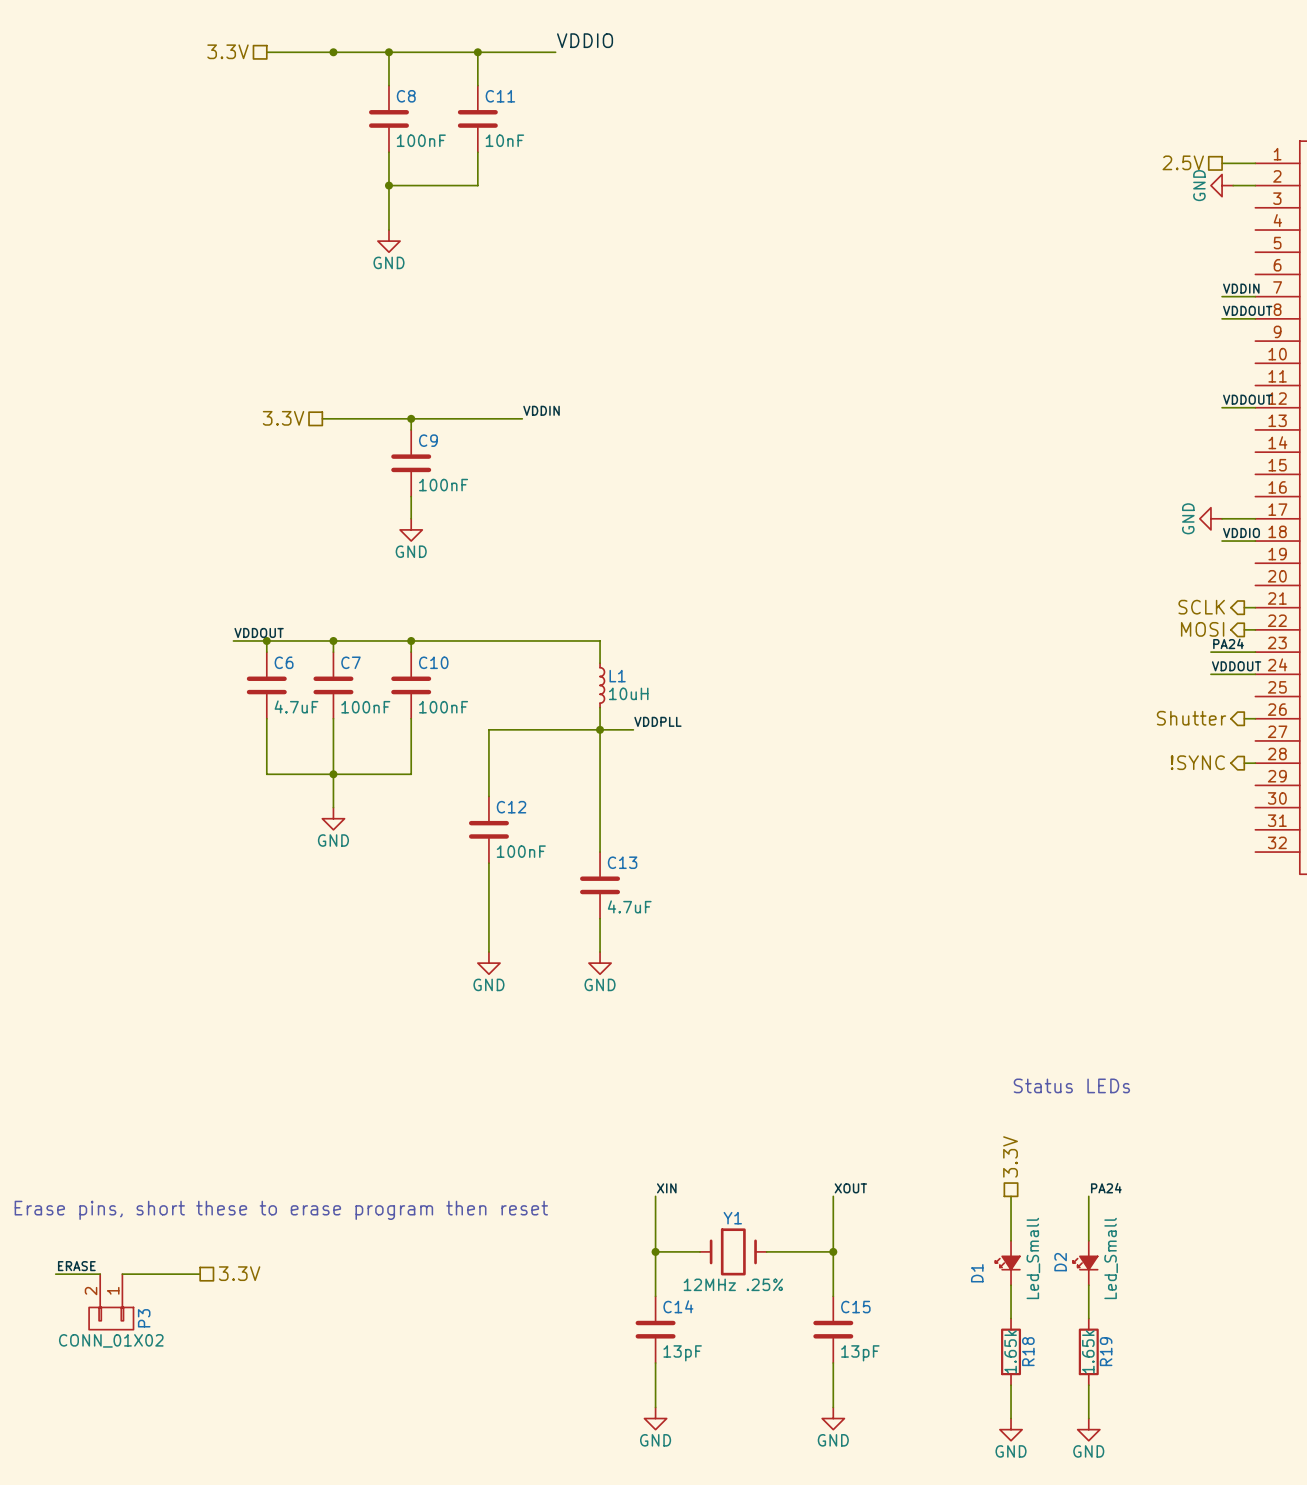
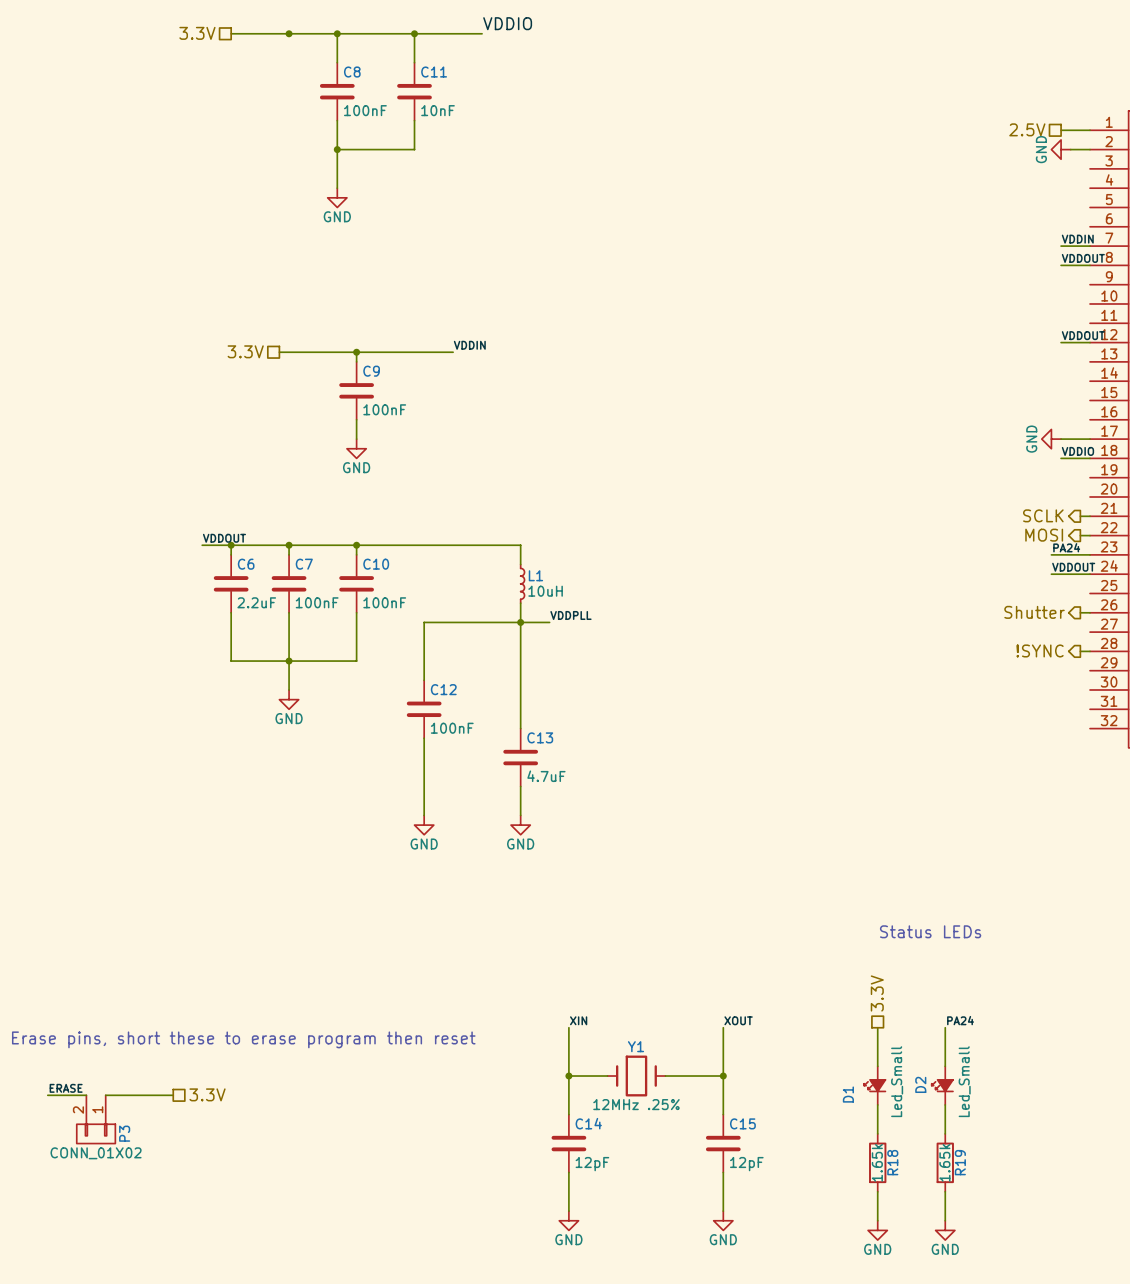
C6 value: 4.7uF (296, 706) -> 2.2uF (256, 602)
C14 value: 13pF (682, 1353) -> 12pF (592, 1164)
C15 value: 13pF (860, 1353) -> 12pF (746, 1164)

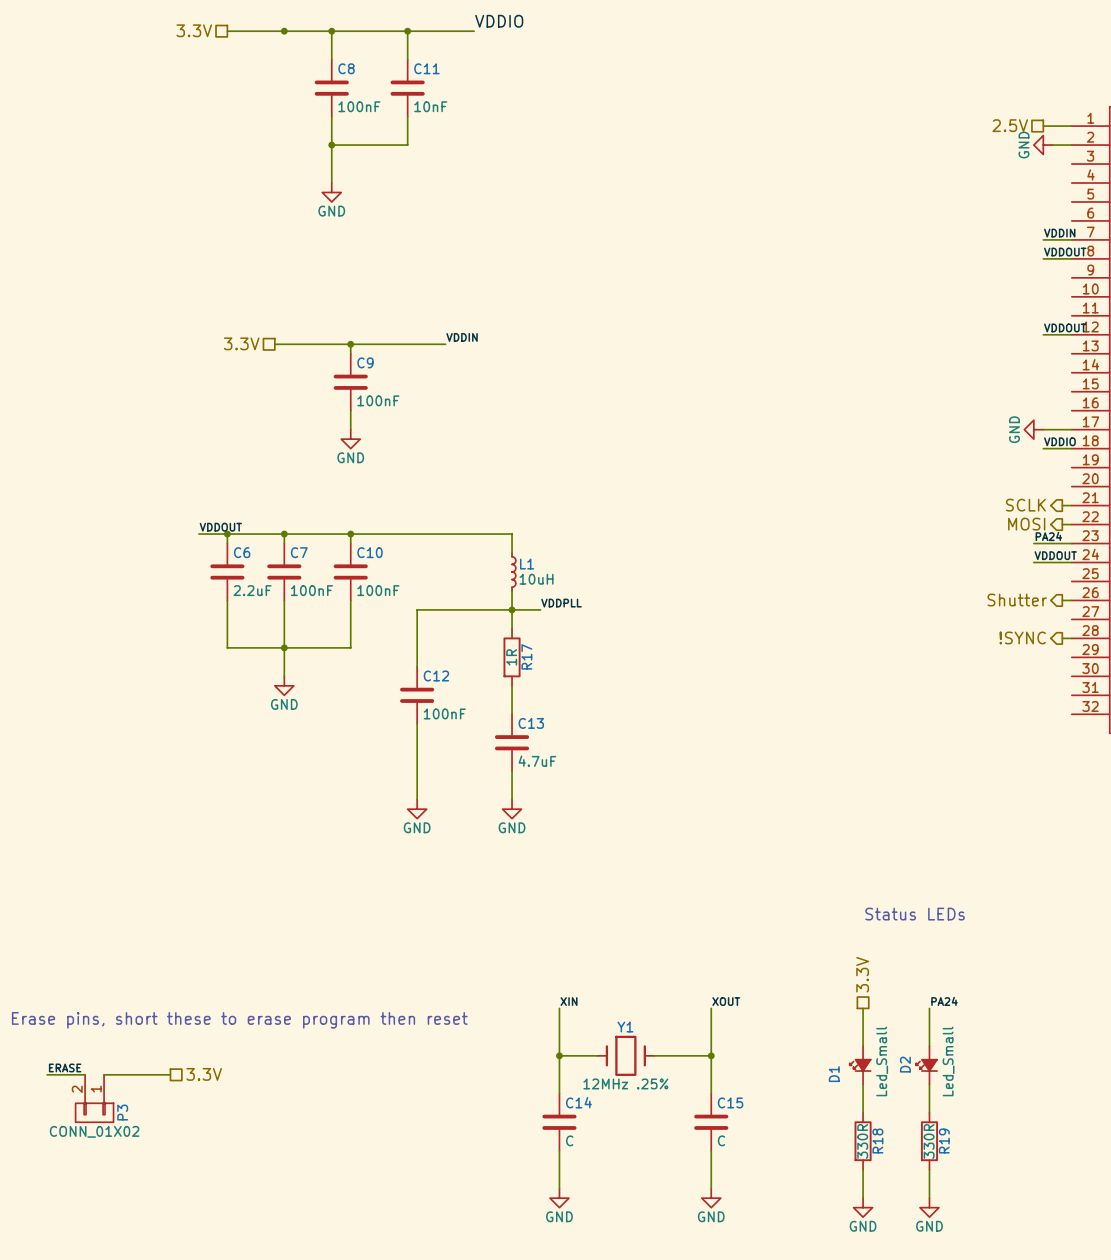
wire: (520, 641) (520, 699) -> none
R17: none -> 1R (512, 657)
R18 value: 1.65k (877, 1162) -> 330R (862, 1141)
R19 value: 1.65k (944, 1162) -> 330R (929, 1141)
C14 value: 12pF (592, 1164) -> C (569, 1140)
C15 value: 12pF (746, 1164) -> C (721, 1140)

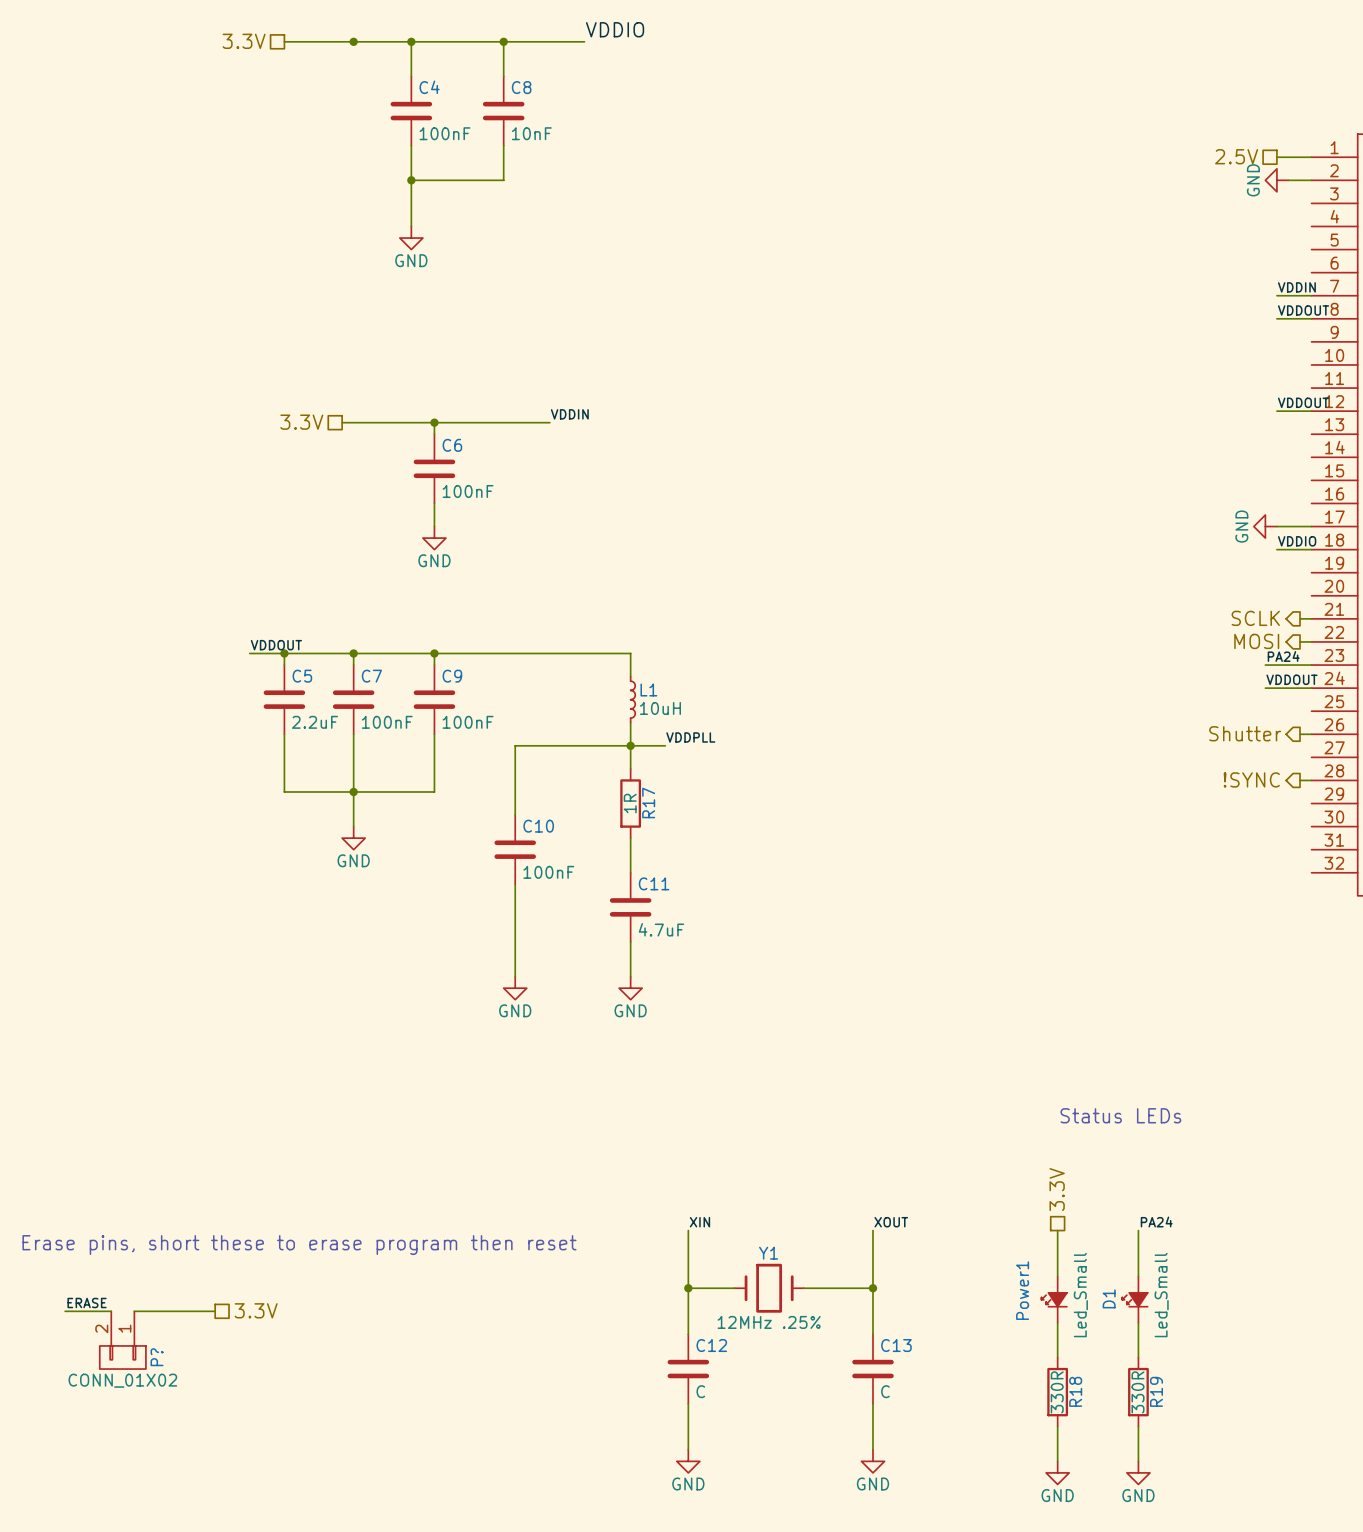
C8 name: C8 (346, 68) -> C4 (429, 87)
C11 name: C11 (426, 68) -> C8 (521, 87)
C9 name: C9 (365, 362) -> C6 (452, 445)
C6 name: C6 (242, 552) -> C5 (302, 676)
C10 name: C10 (370, 552) -> C9 (452, 676)
C12 name: C12 (436, 676) -> C10 (538, 826)
C13 name: C13 (531, 723) -> C11 (654, 883)
D2 name: D2 (905, 1064) -> D1 (1109, 1298)
D1 name: D1 (834, 1074) -> Power1 (1022, 1290)
C14 name: C14 (578, 1102) -> C12 (711, 1345)
C15 name: C15 (730, 1102) -> C13 (896, 1345)
P3 name: P3 (122, 1112) -> P? (157, 1357)

